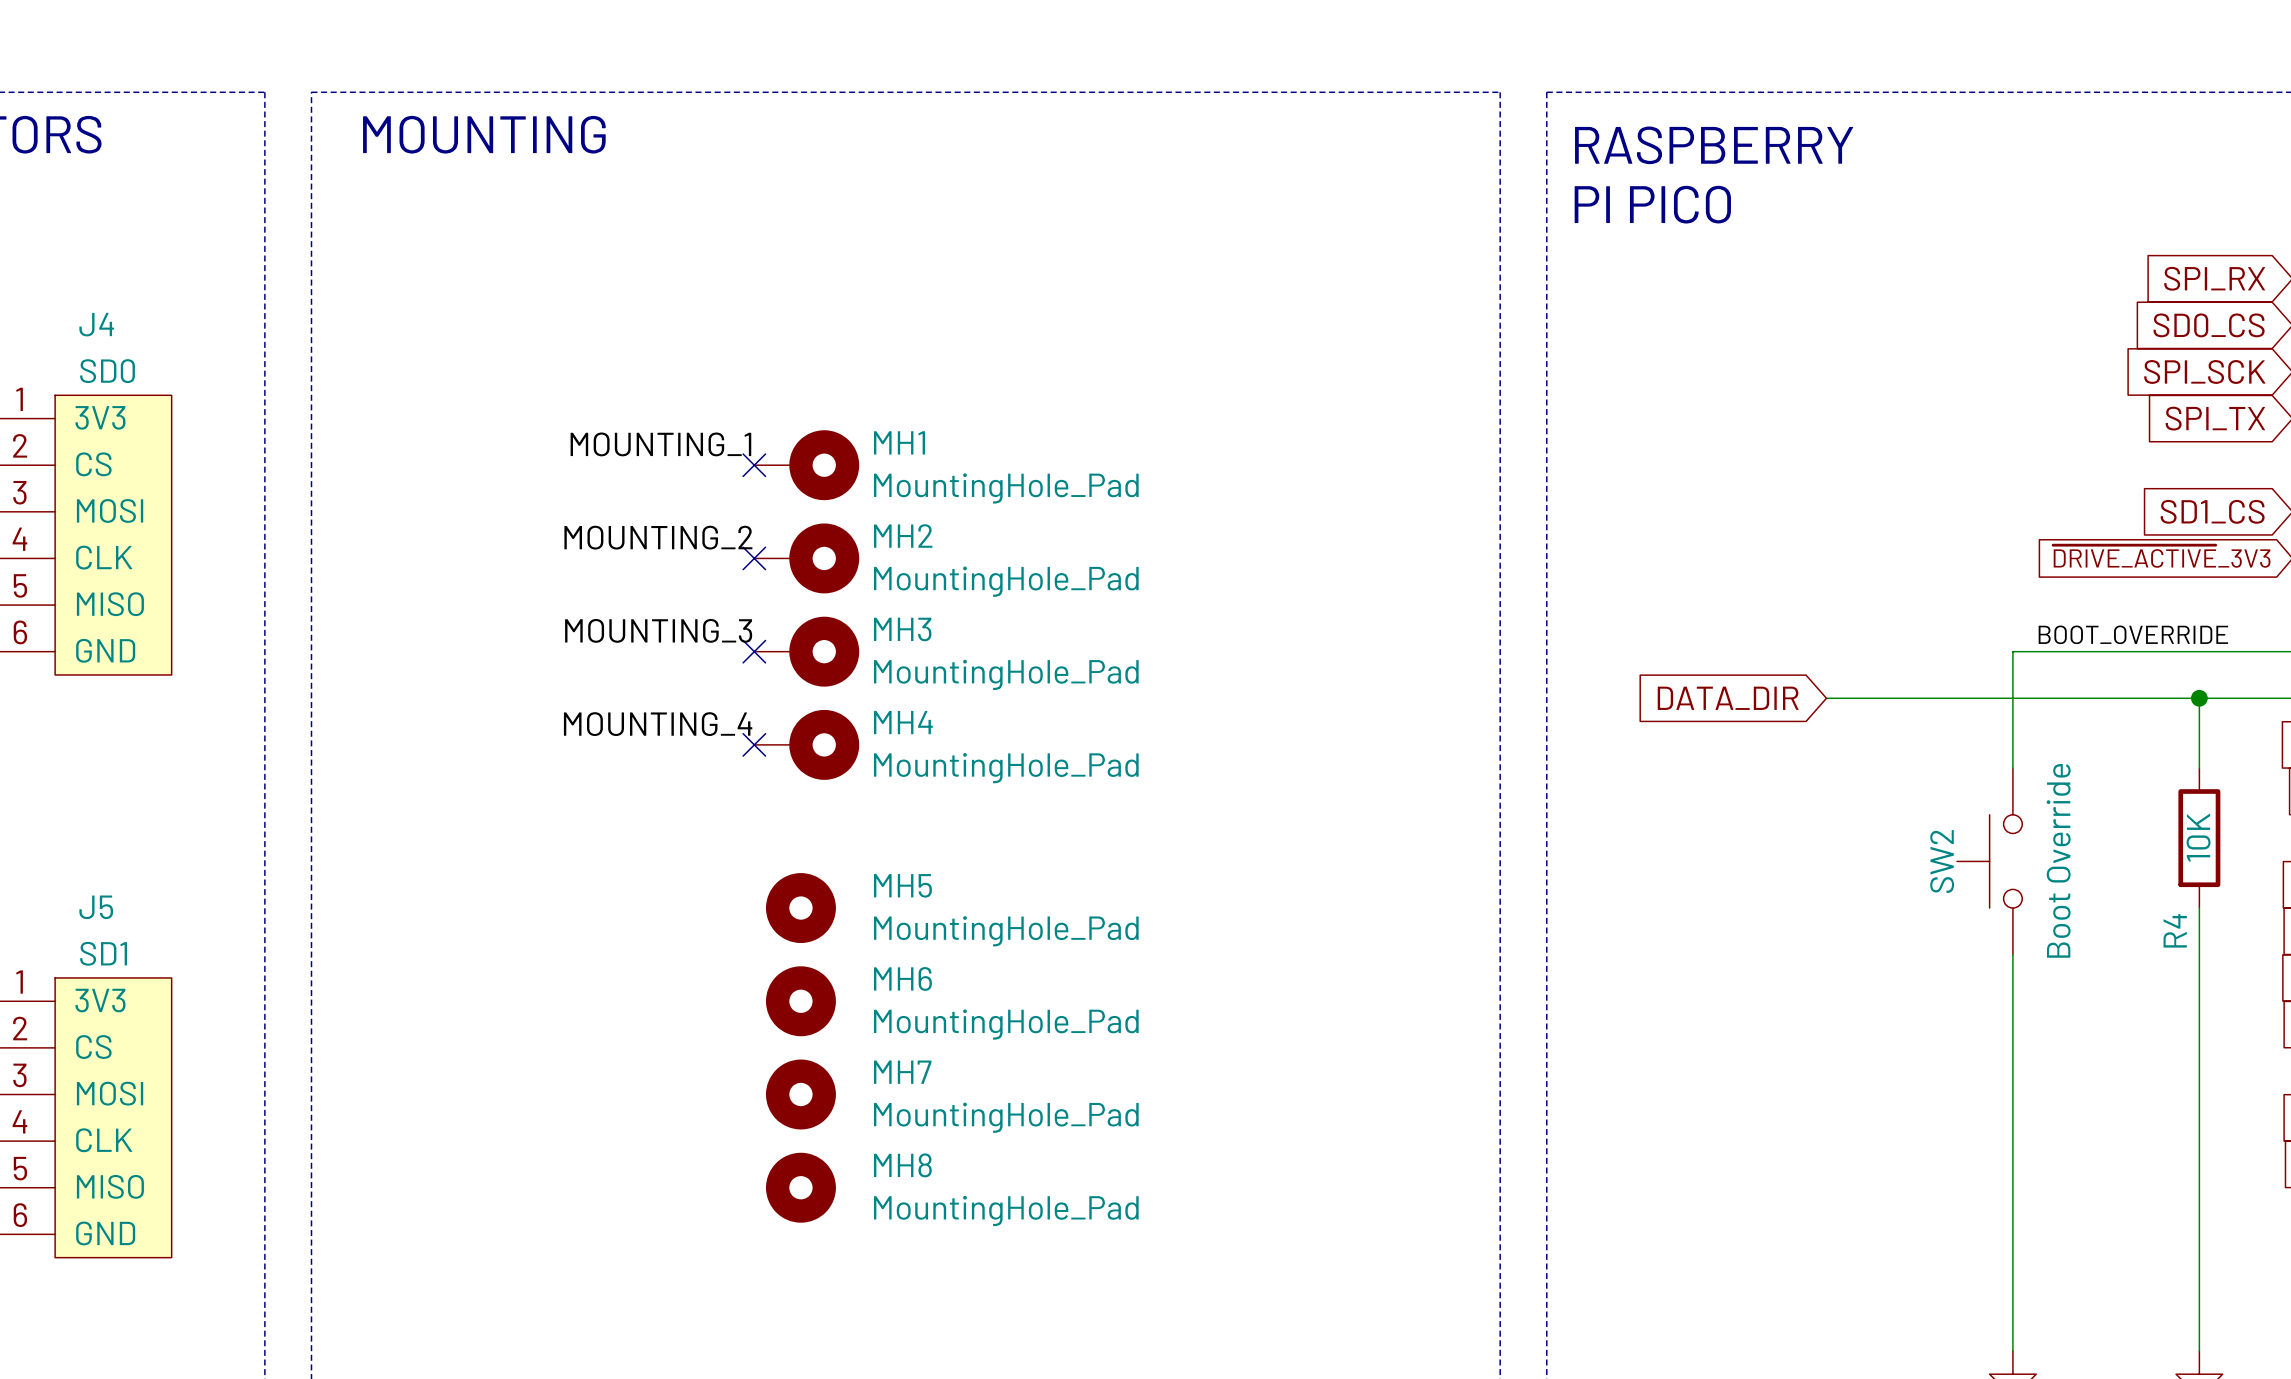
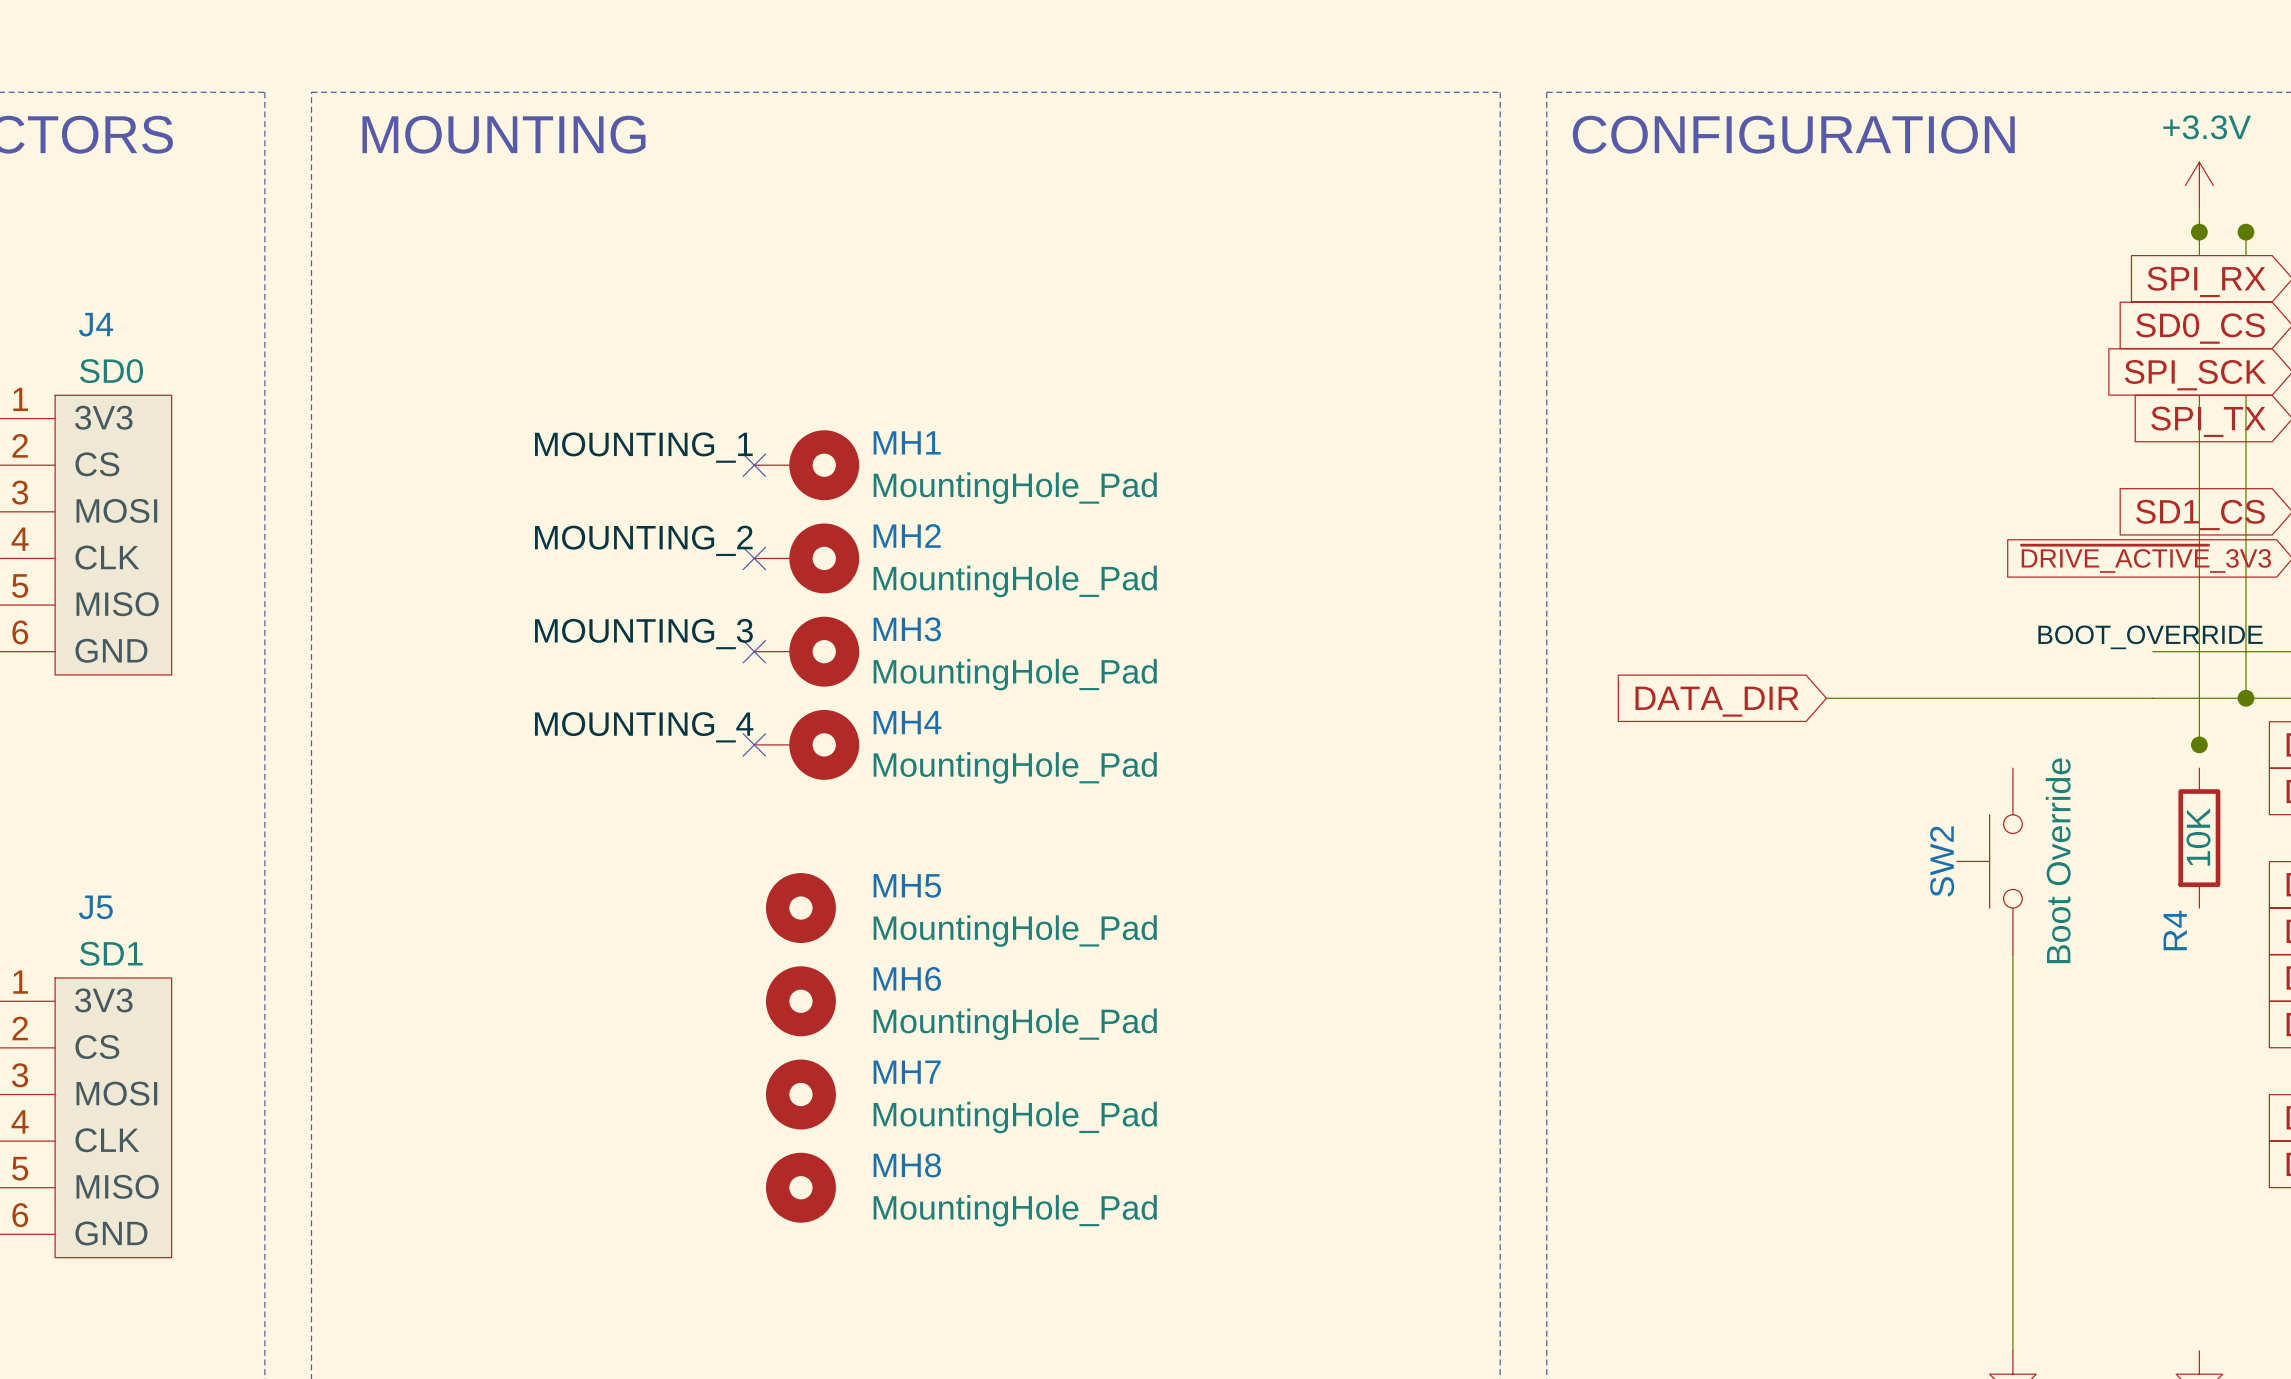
text: RASPBERRY (1714, 145) -> CONFIGURATION (1793, 134)
power symbol: none -> +3.3V (2199, 185)
text: PI PICO (1652, 204) -> none
wire: none -> (2199, 208) (2199, 255)
junction: none -> (2199, 232)
wire: none -> (2245, 232) (2245, 255)
junction: none -> (2245, 232)
wire: none -> (2199, 395) (2199, 698)
wire: none -> (2245, 395) (2245, 698)
wire: (2152, 651) (2012, 651) (2012, 768) -> none
junction: (2199, 698) -> none
junction: none -> (2245, 698)
wire: (2199, 744) (2199, 768) -> none
junction: none -> (2199, 744)
wire: (2199, 908) (2199, 1350) -> none

